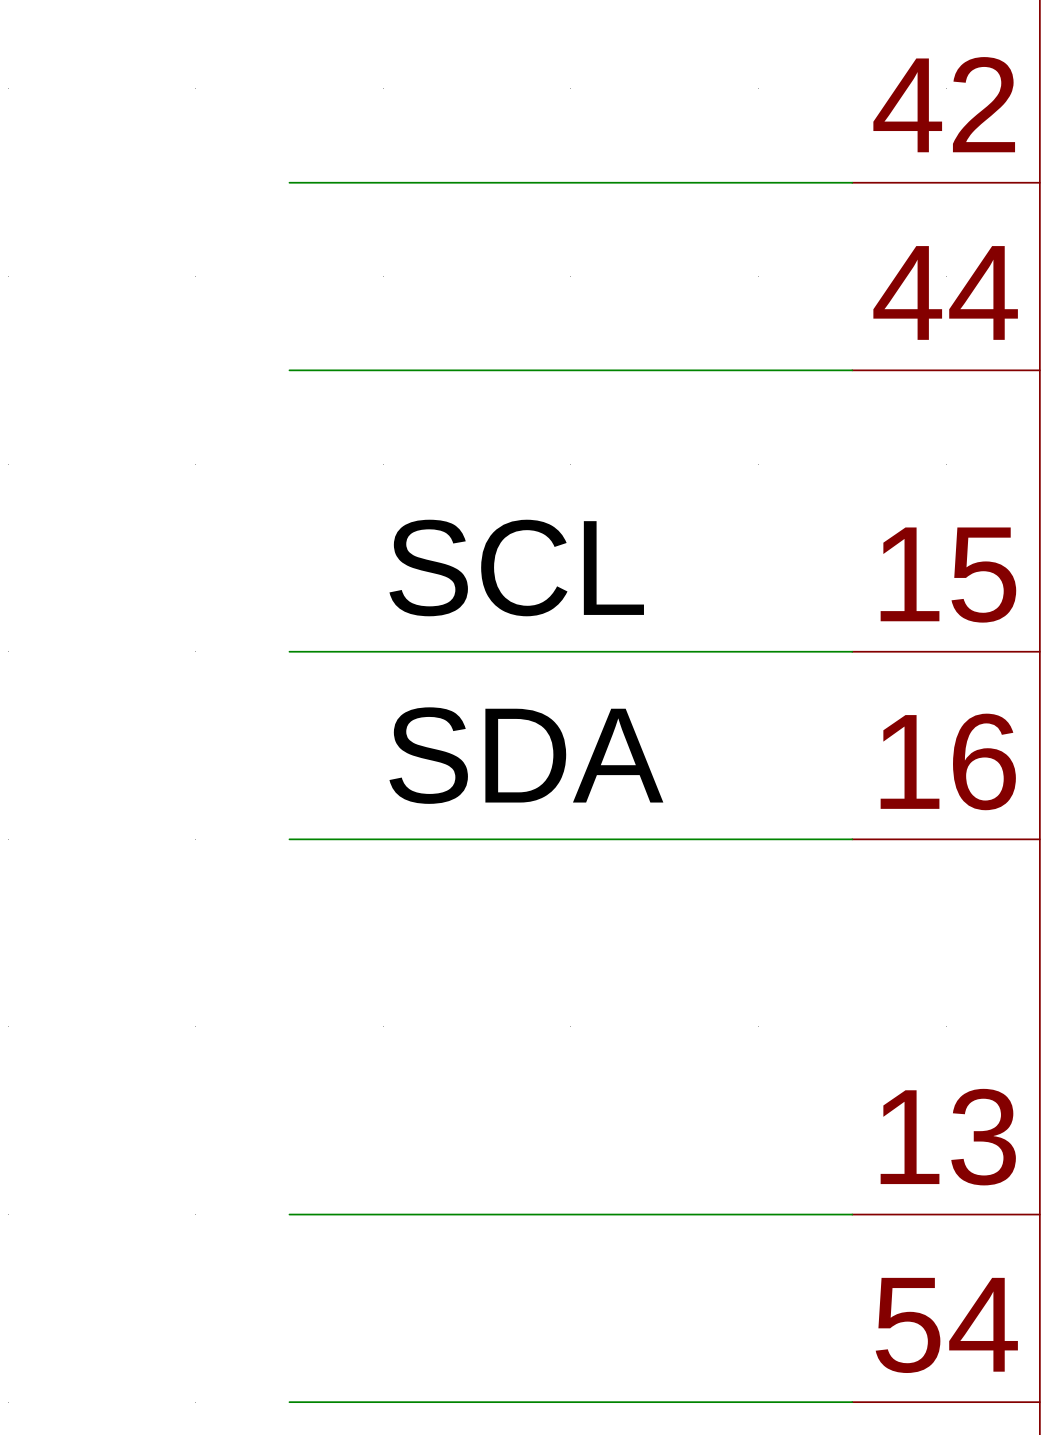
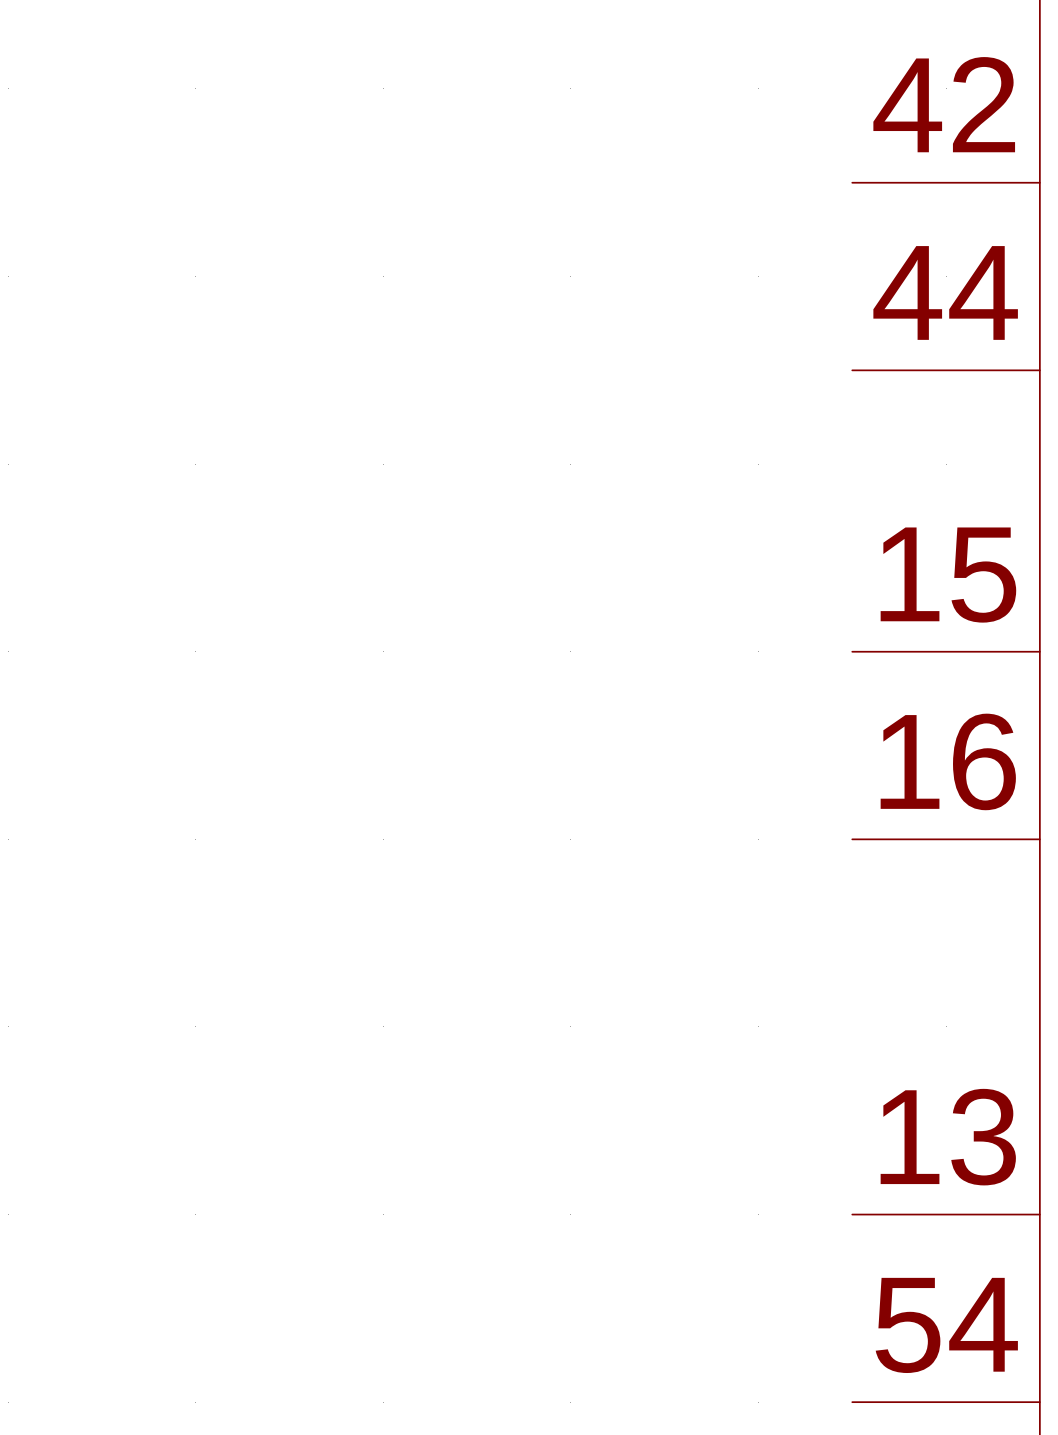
wire: (289, 182) (852, 182) -> none
wire: (289, 370) (852, 370) -> none
label: SCL (516, 568) -> none
wire: (289, 651) (852, 651) -> none
label: SDA (526, 755) -> none
wire: (289, 839) (852, 839) -> none
wire: (289, 1214) (852, 1214) -> none
wire: (289, 1402) (852, 1402) -> none

